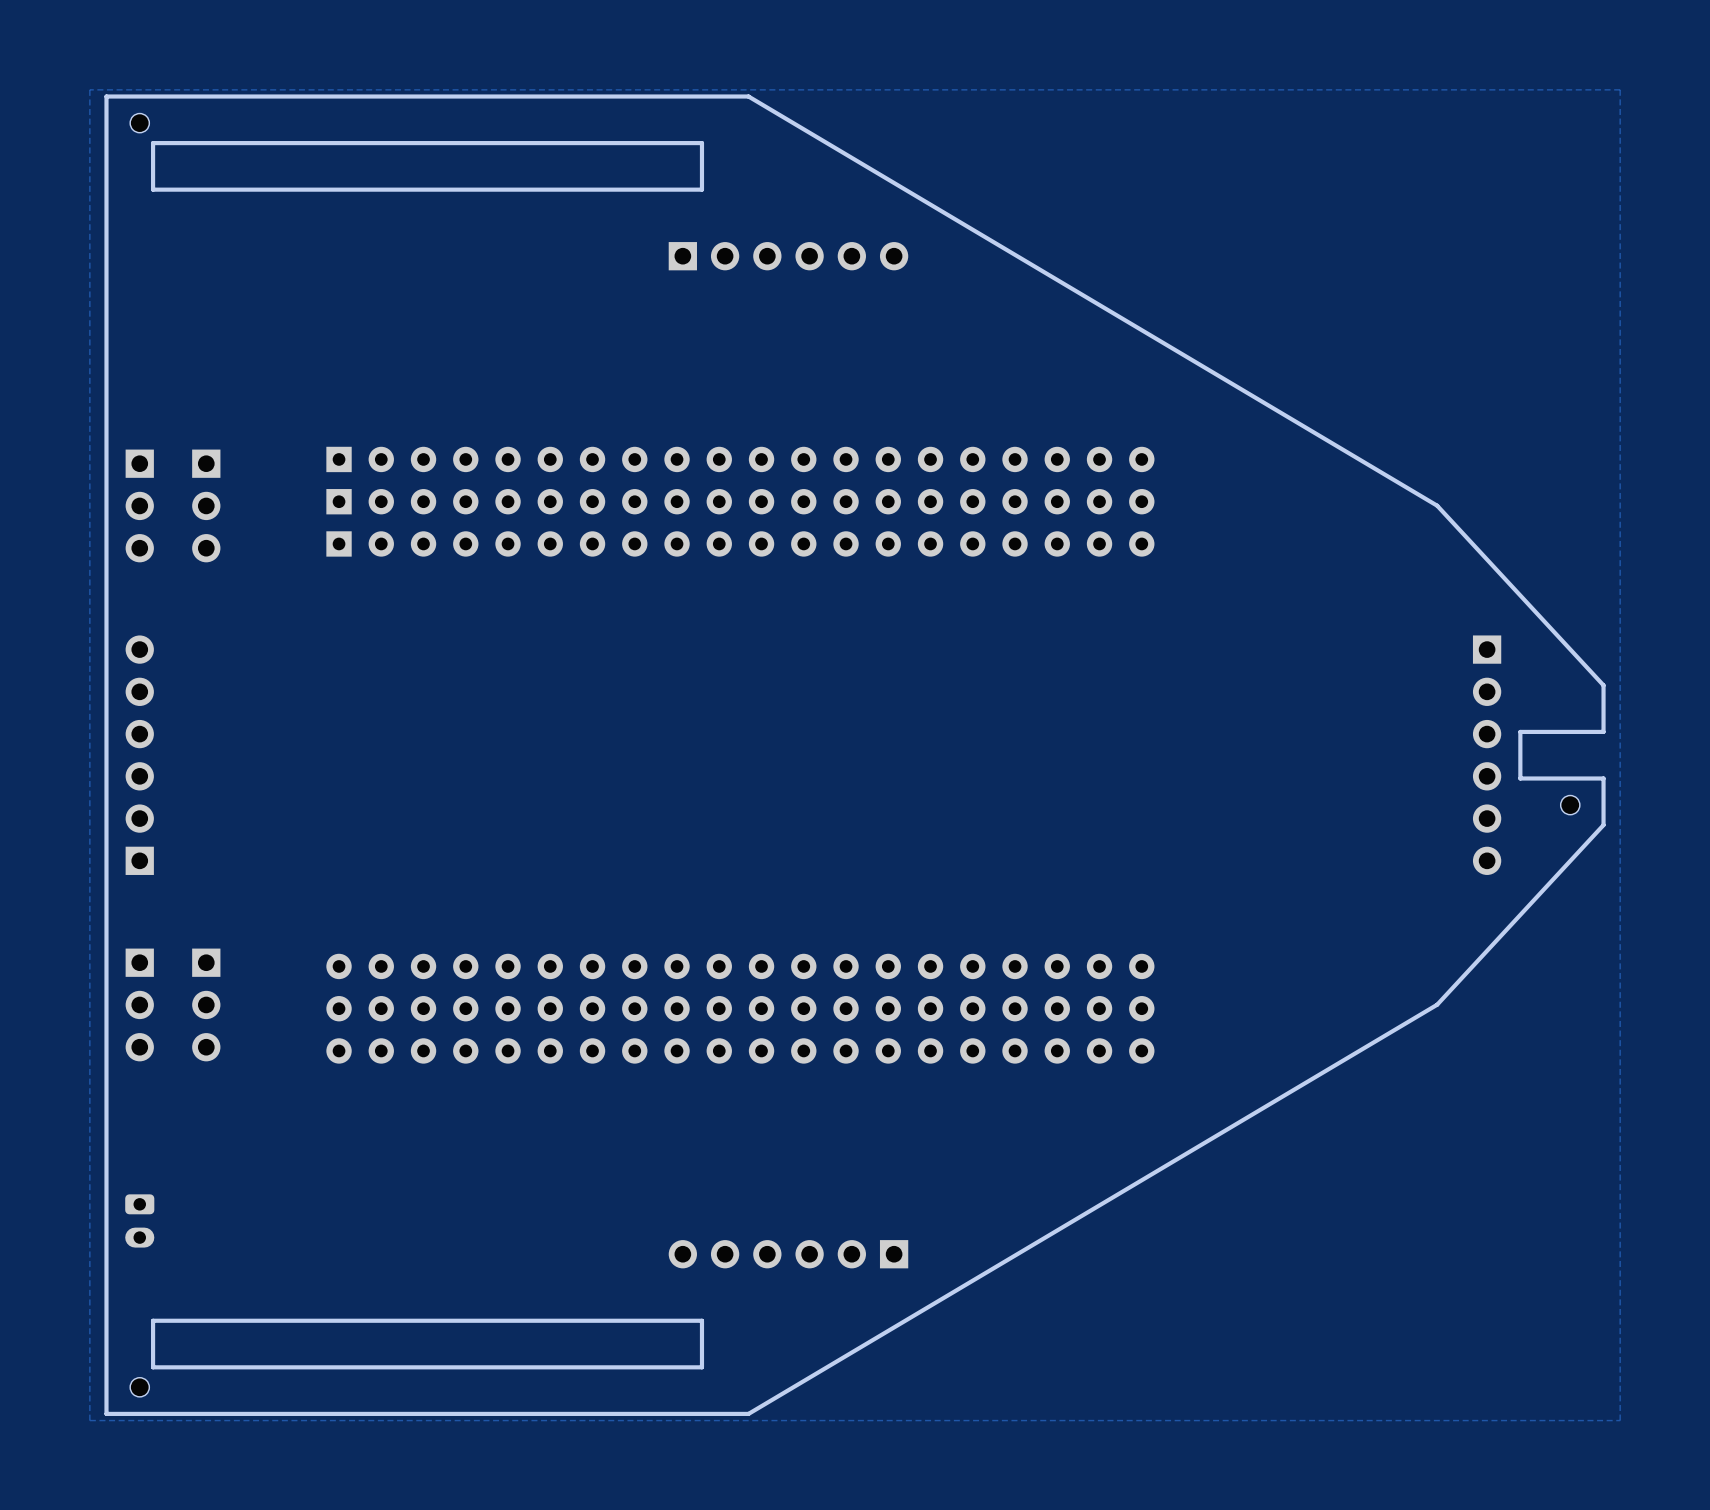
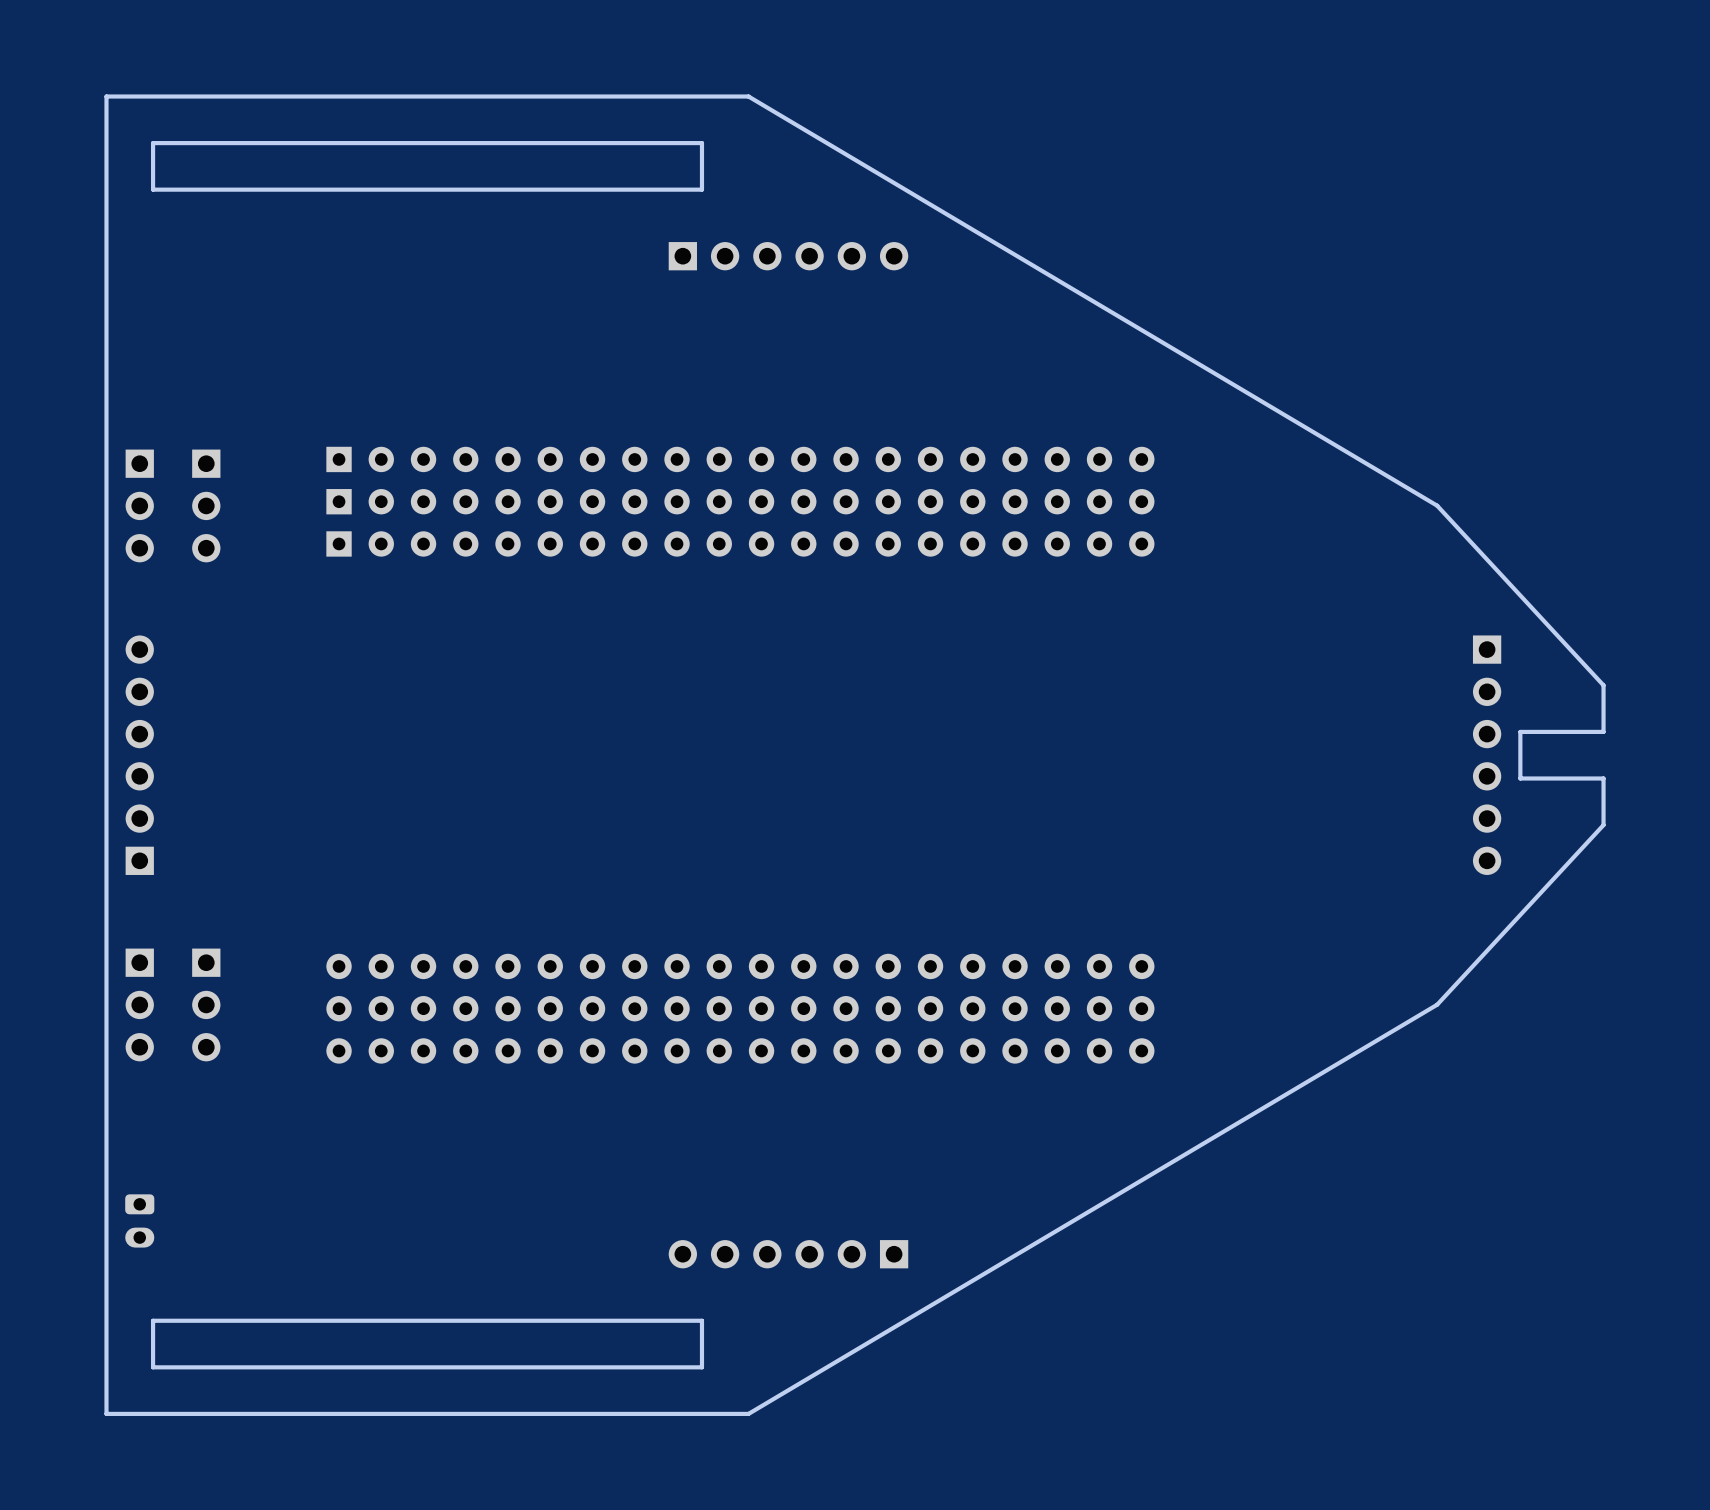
zone outline: (1620, 89) (1620, 1420) (89, 1420) (89, 89) (1620, 89) -> none
part: (139, 123) -> none
part: (1570, 805) -> none
part: (139, 1387) -> none

